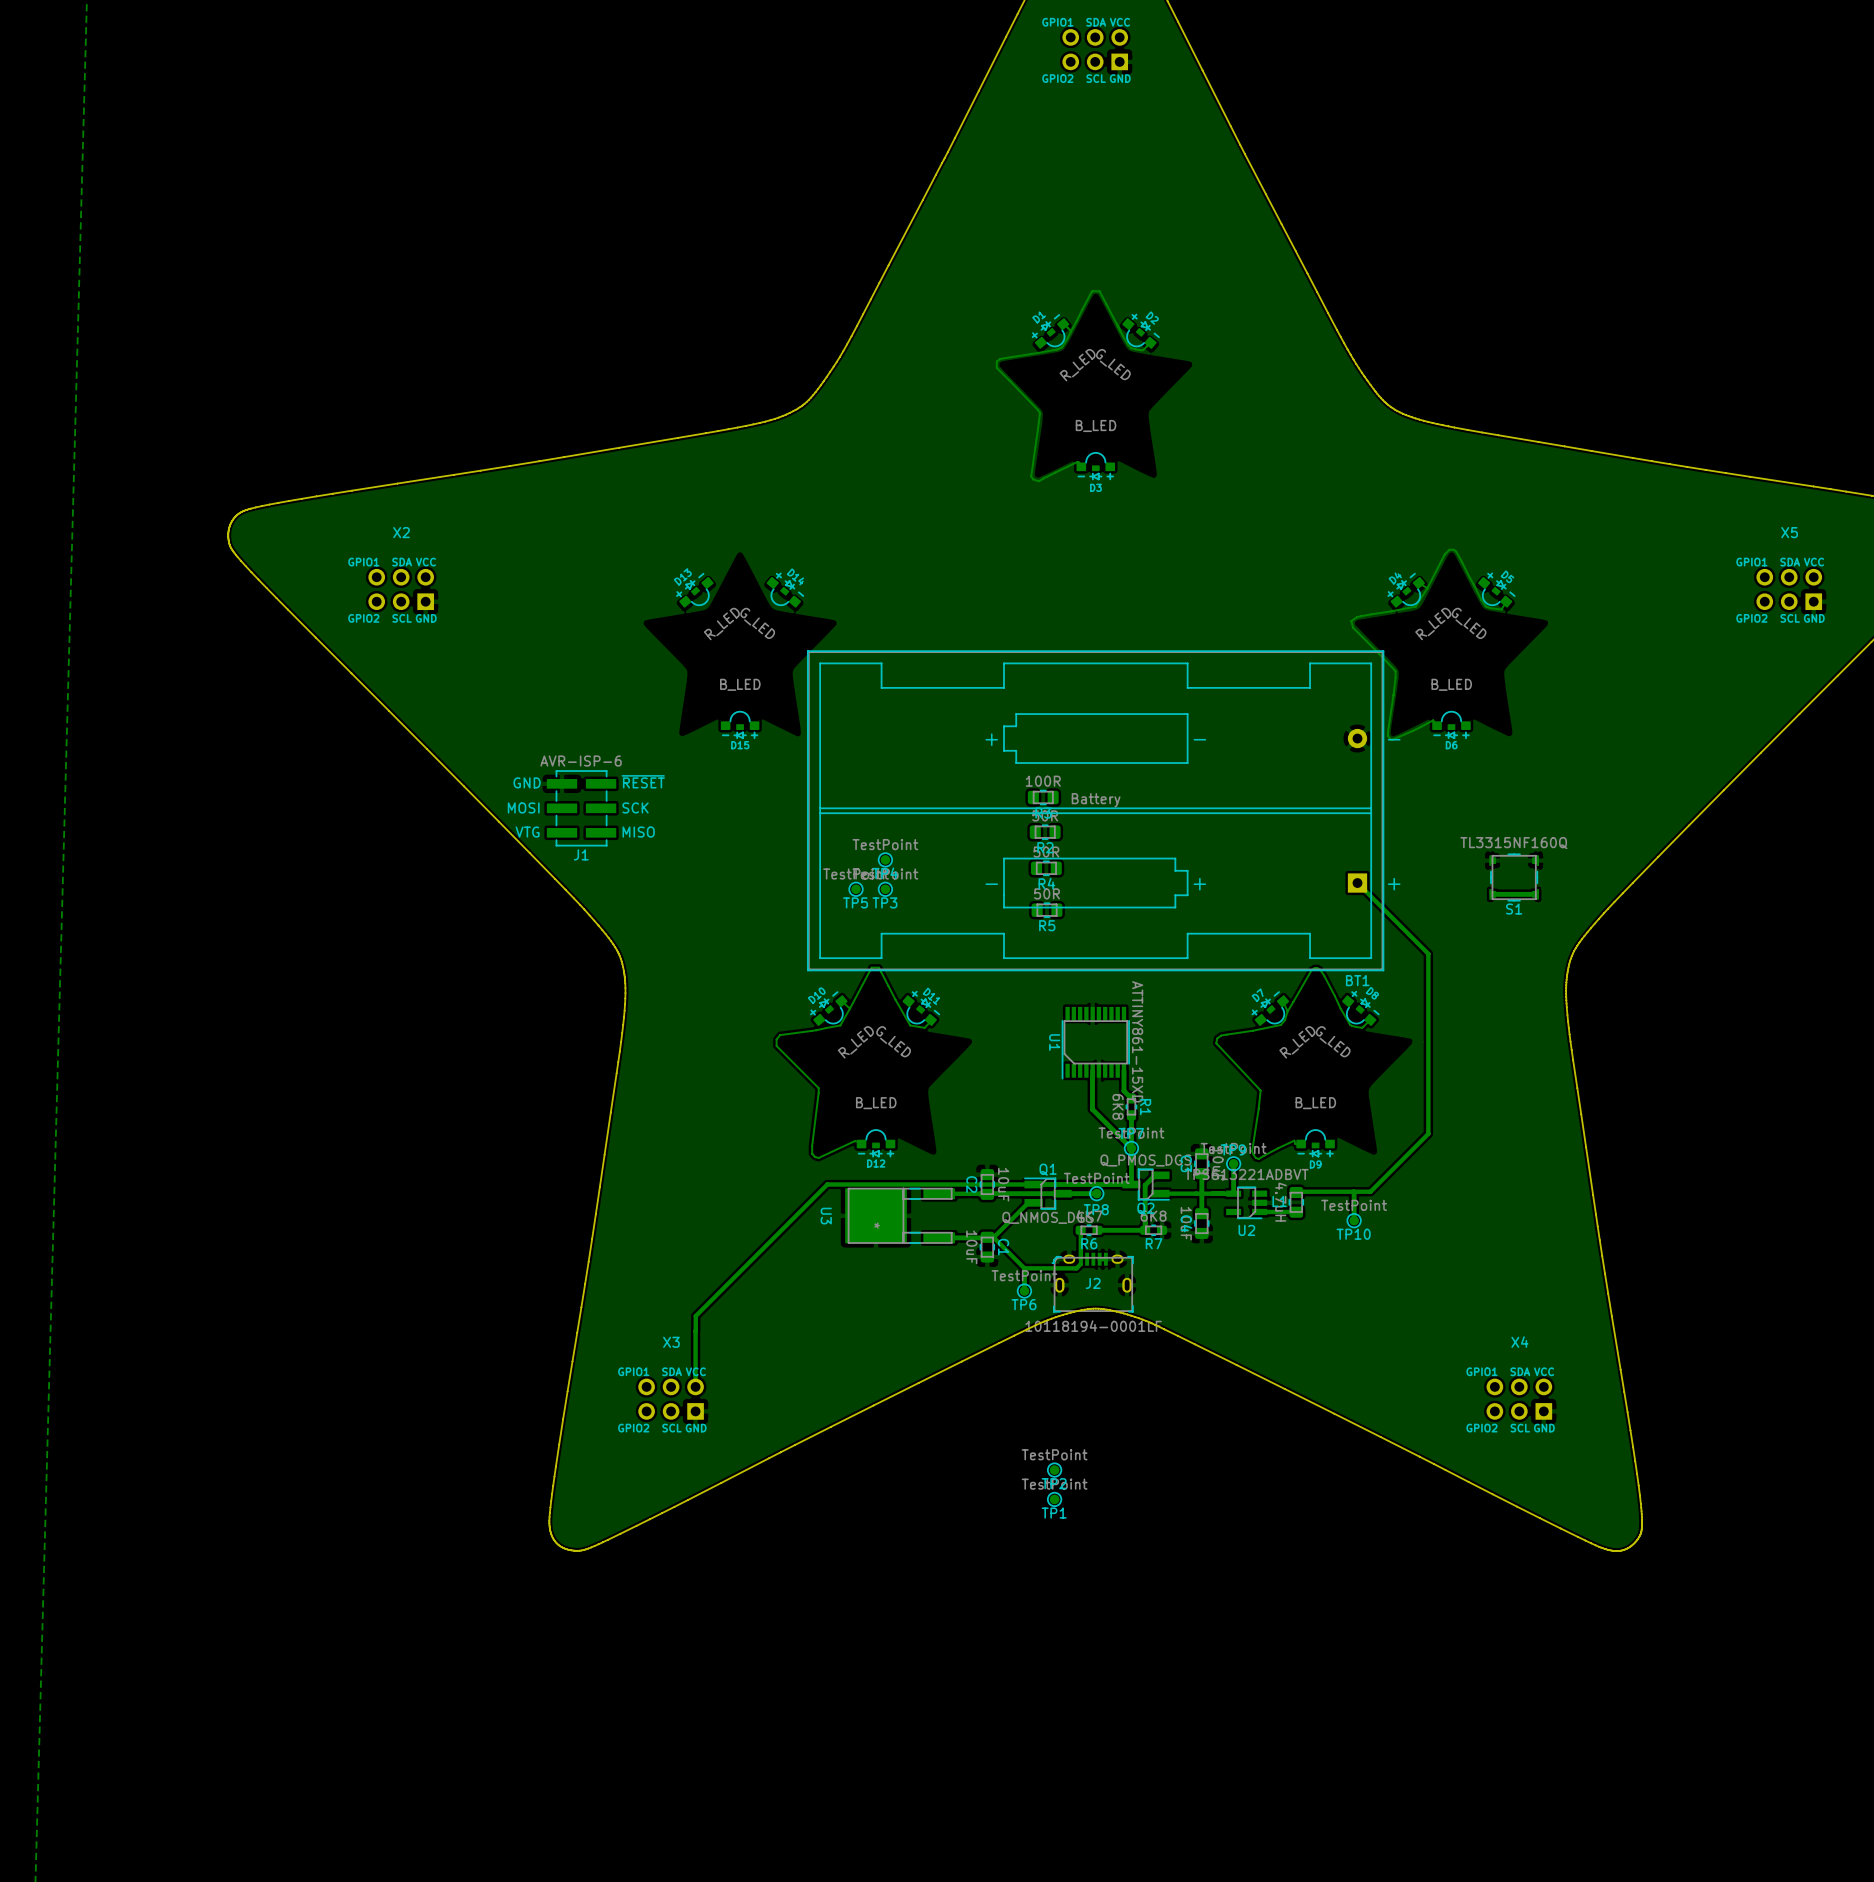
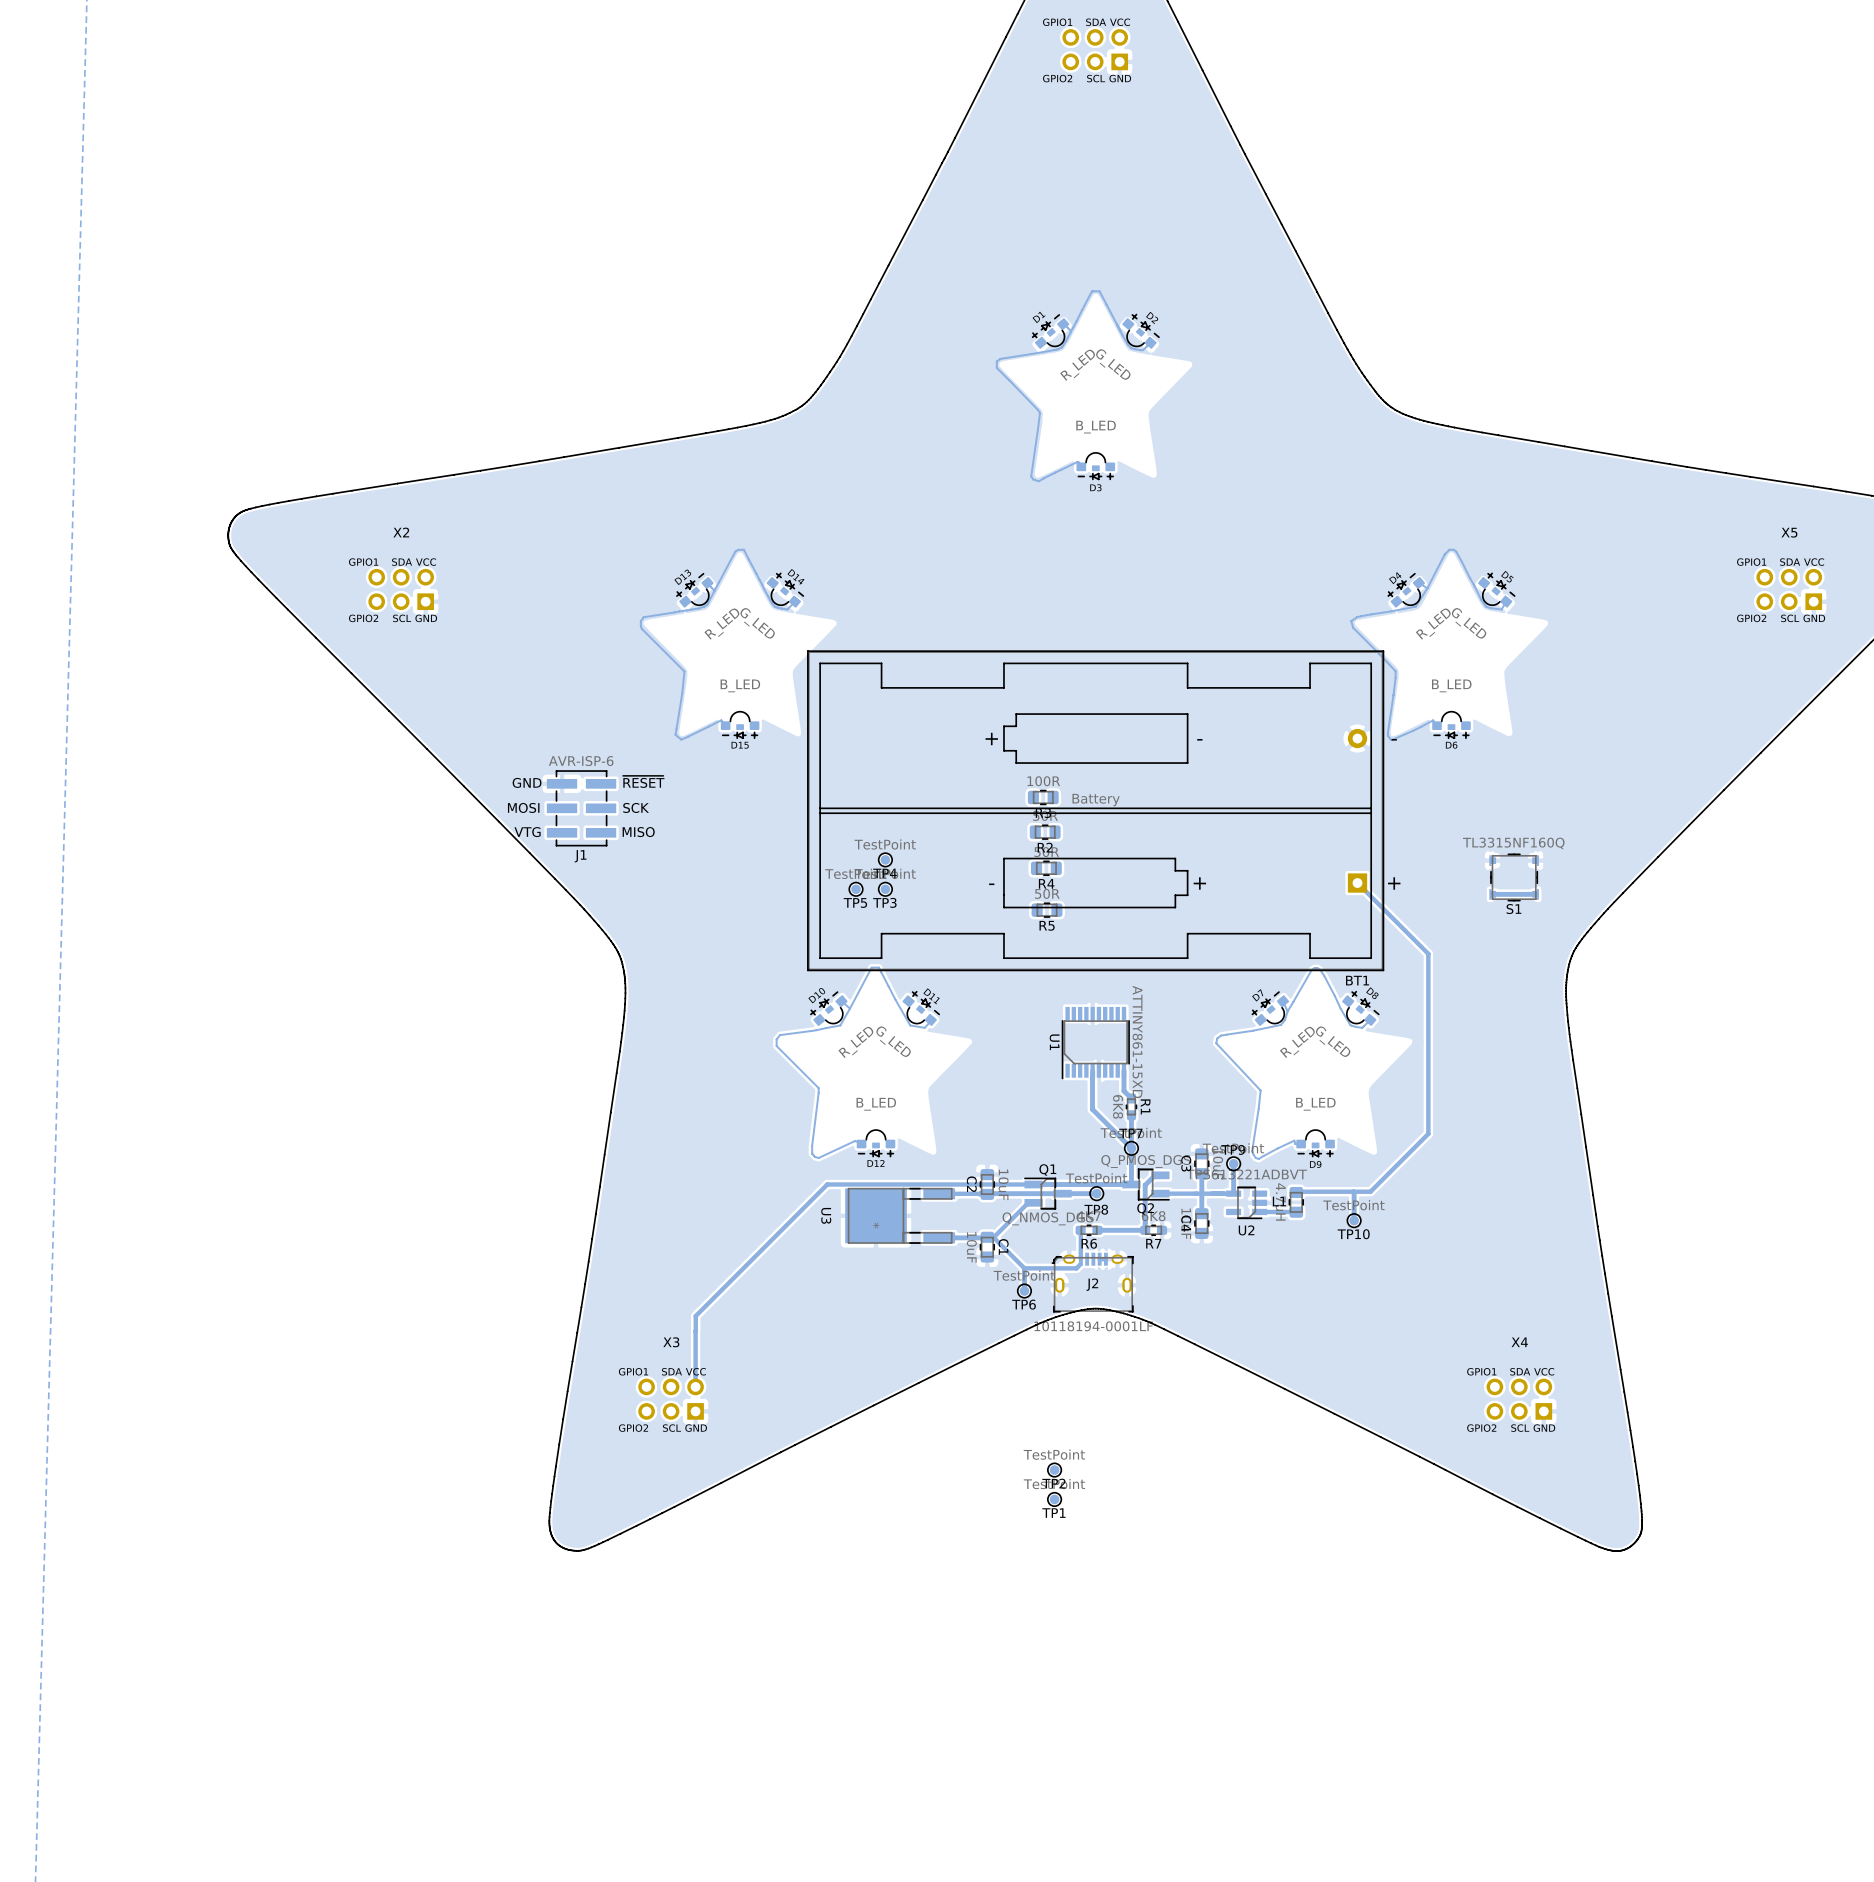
track: none -> (706, 582) (714, 590)
track: none -> (795, 601) (787, 609) (774, 606) (743, 549) (738, 549) (735, 551) (707, 604) (698, 608) (643, 617) (640, 621) (641, 628) (684, 671) (675, 734) (681, 739) (721, 720) (725, 725)

